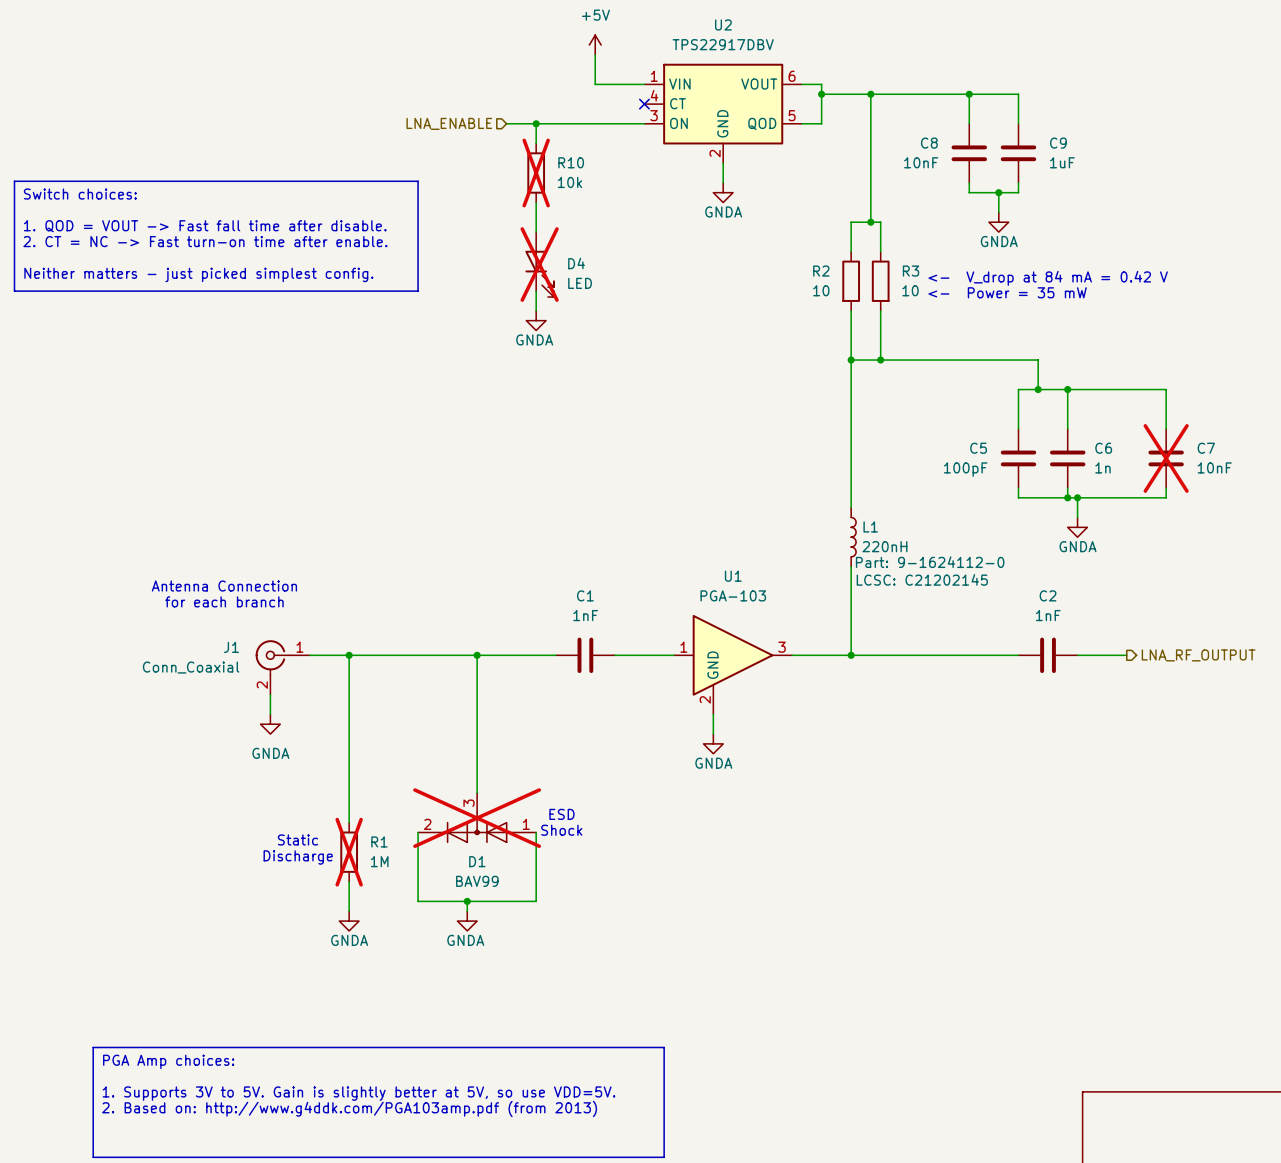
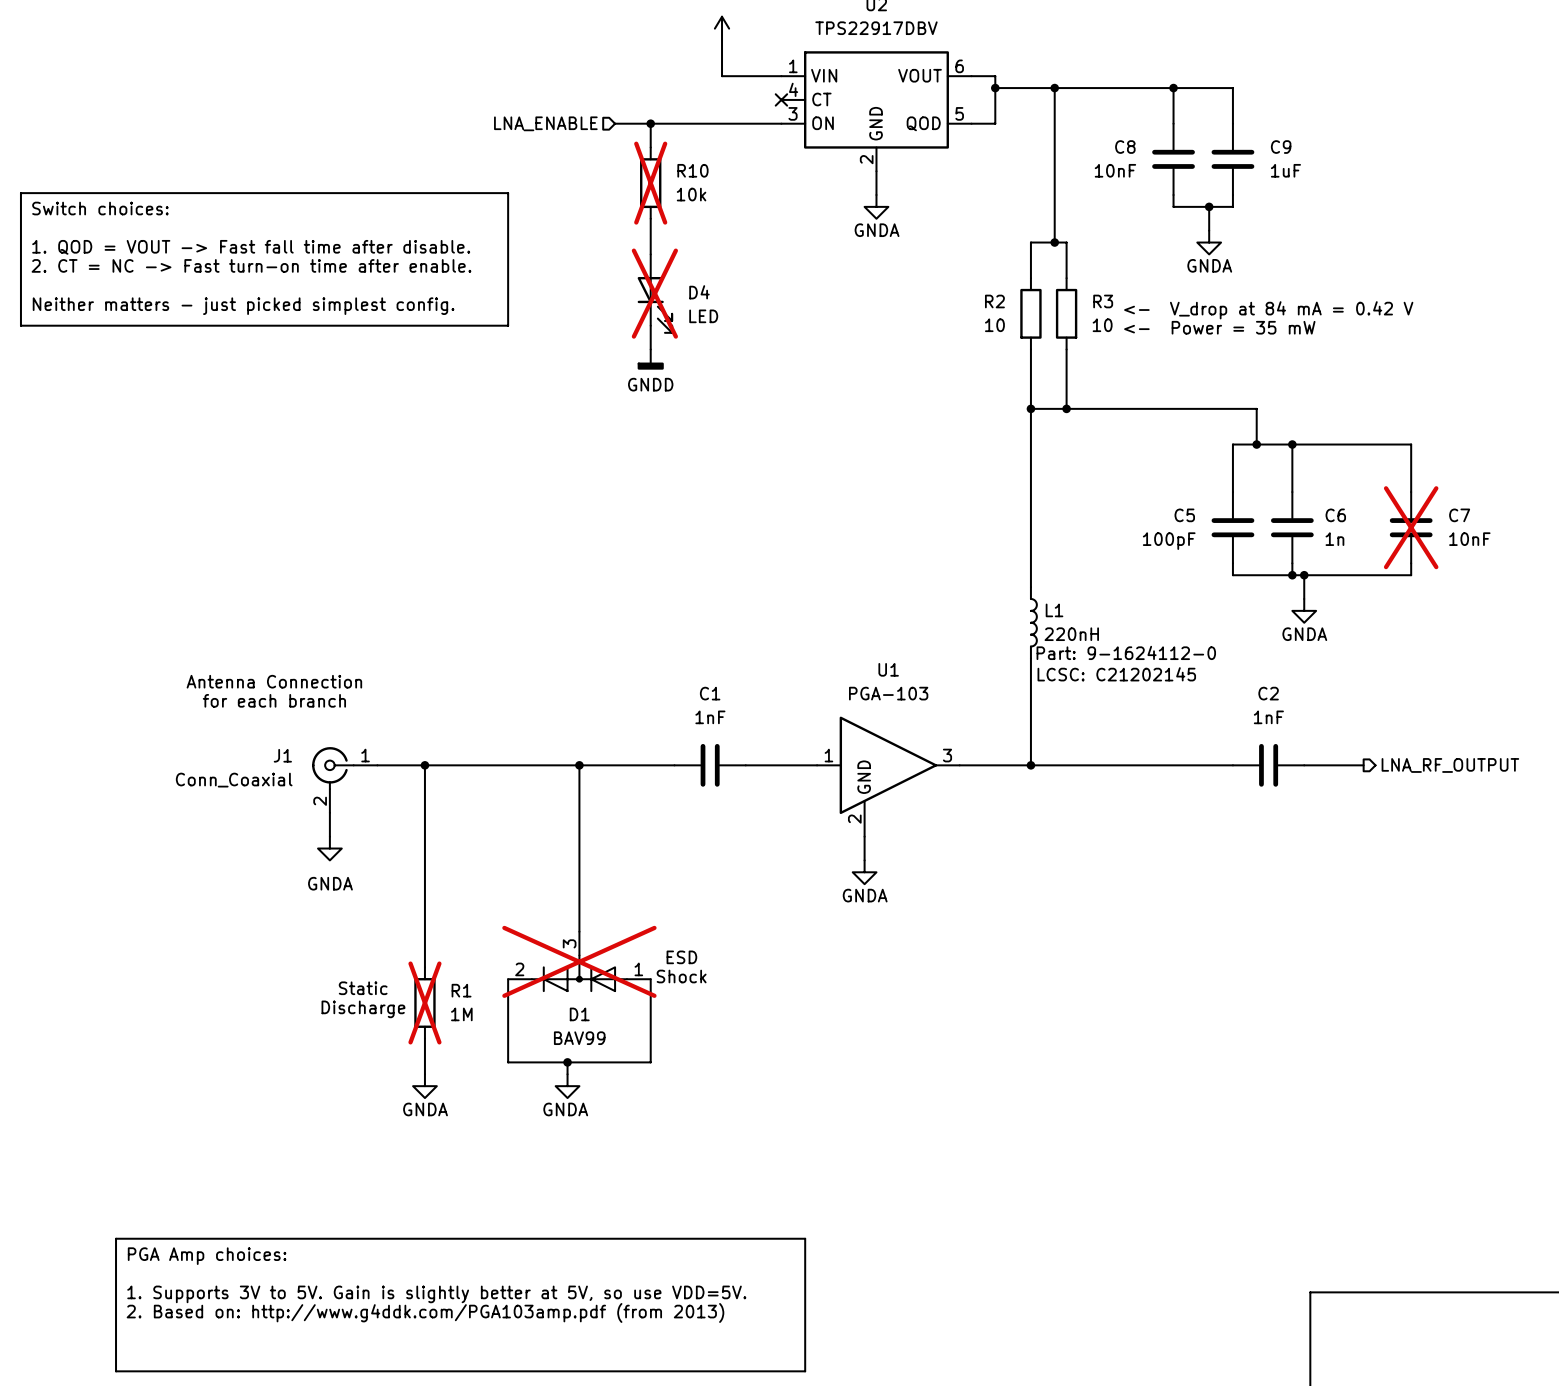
power symbol: GNDA (536, 320) -> GNDD (650, 359)

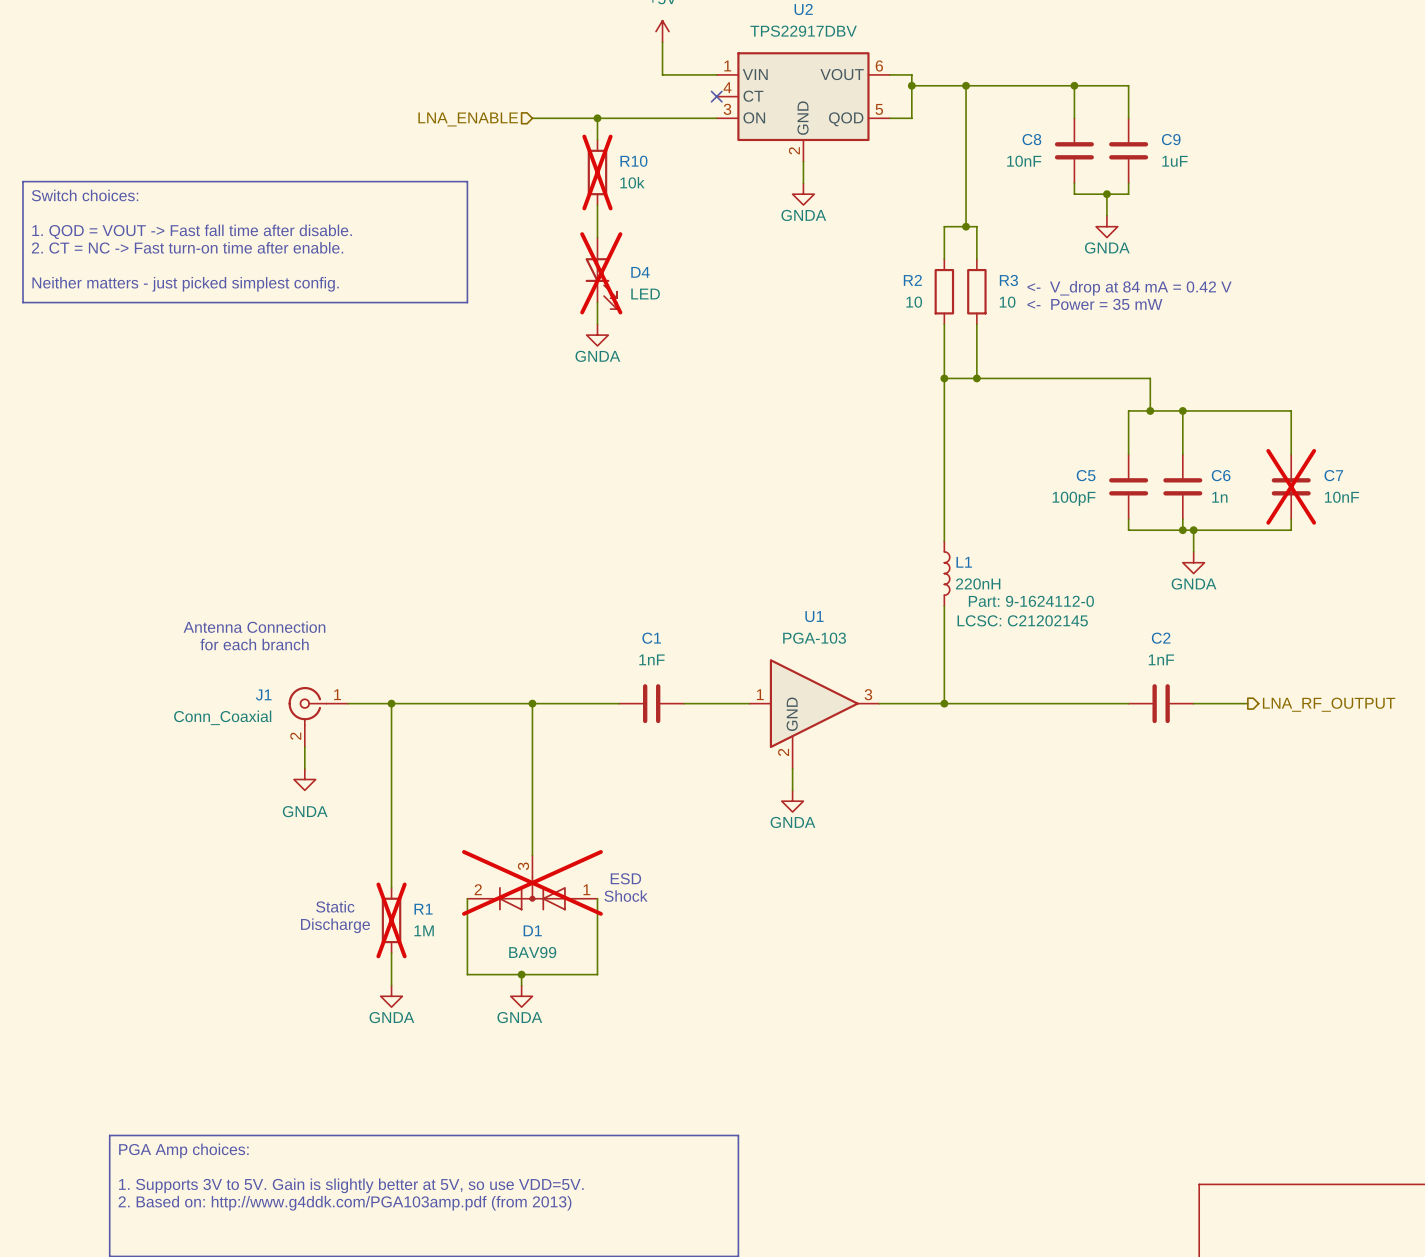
hierarchical label position: LNA_ENABLE (545, 123) -> LNA_ENABLE (468, 119)
wire: none -> (532, 118) (564, 118)
power symbol: GNDD (650, 359) -> GNDA (597, 335)

